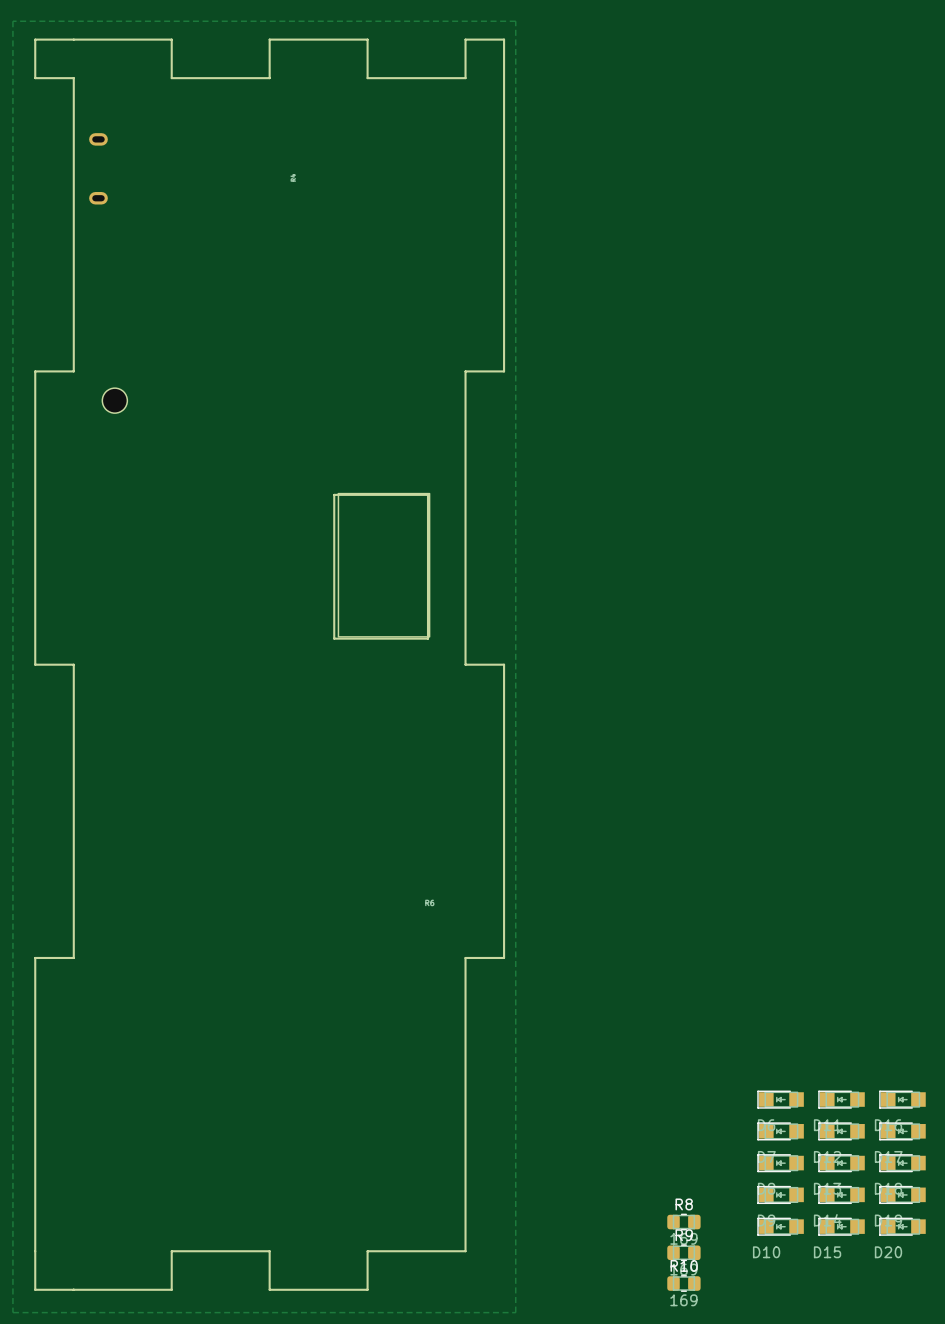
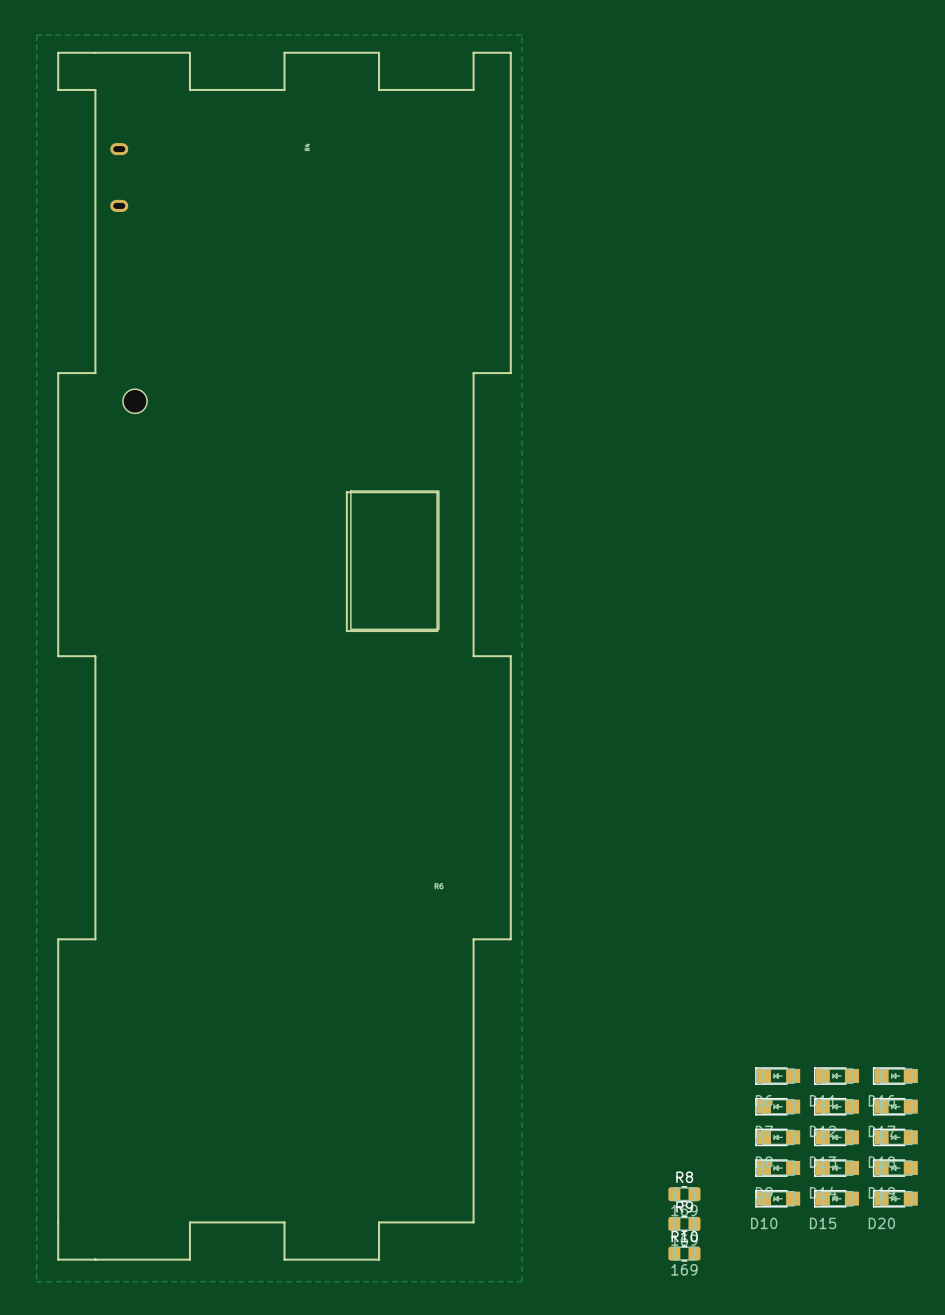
part position: (293, 177) -> (307, 147)

